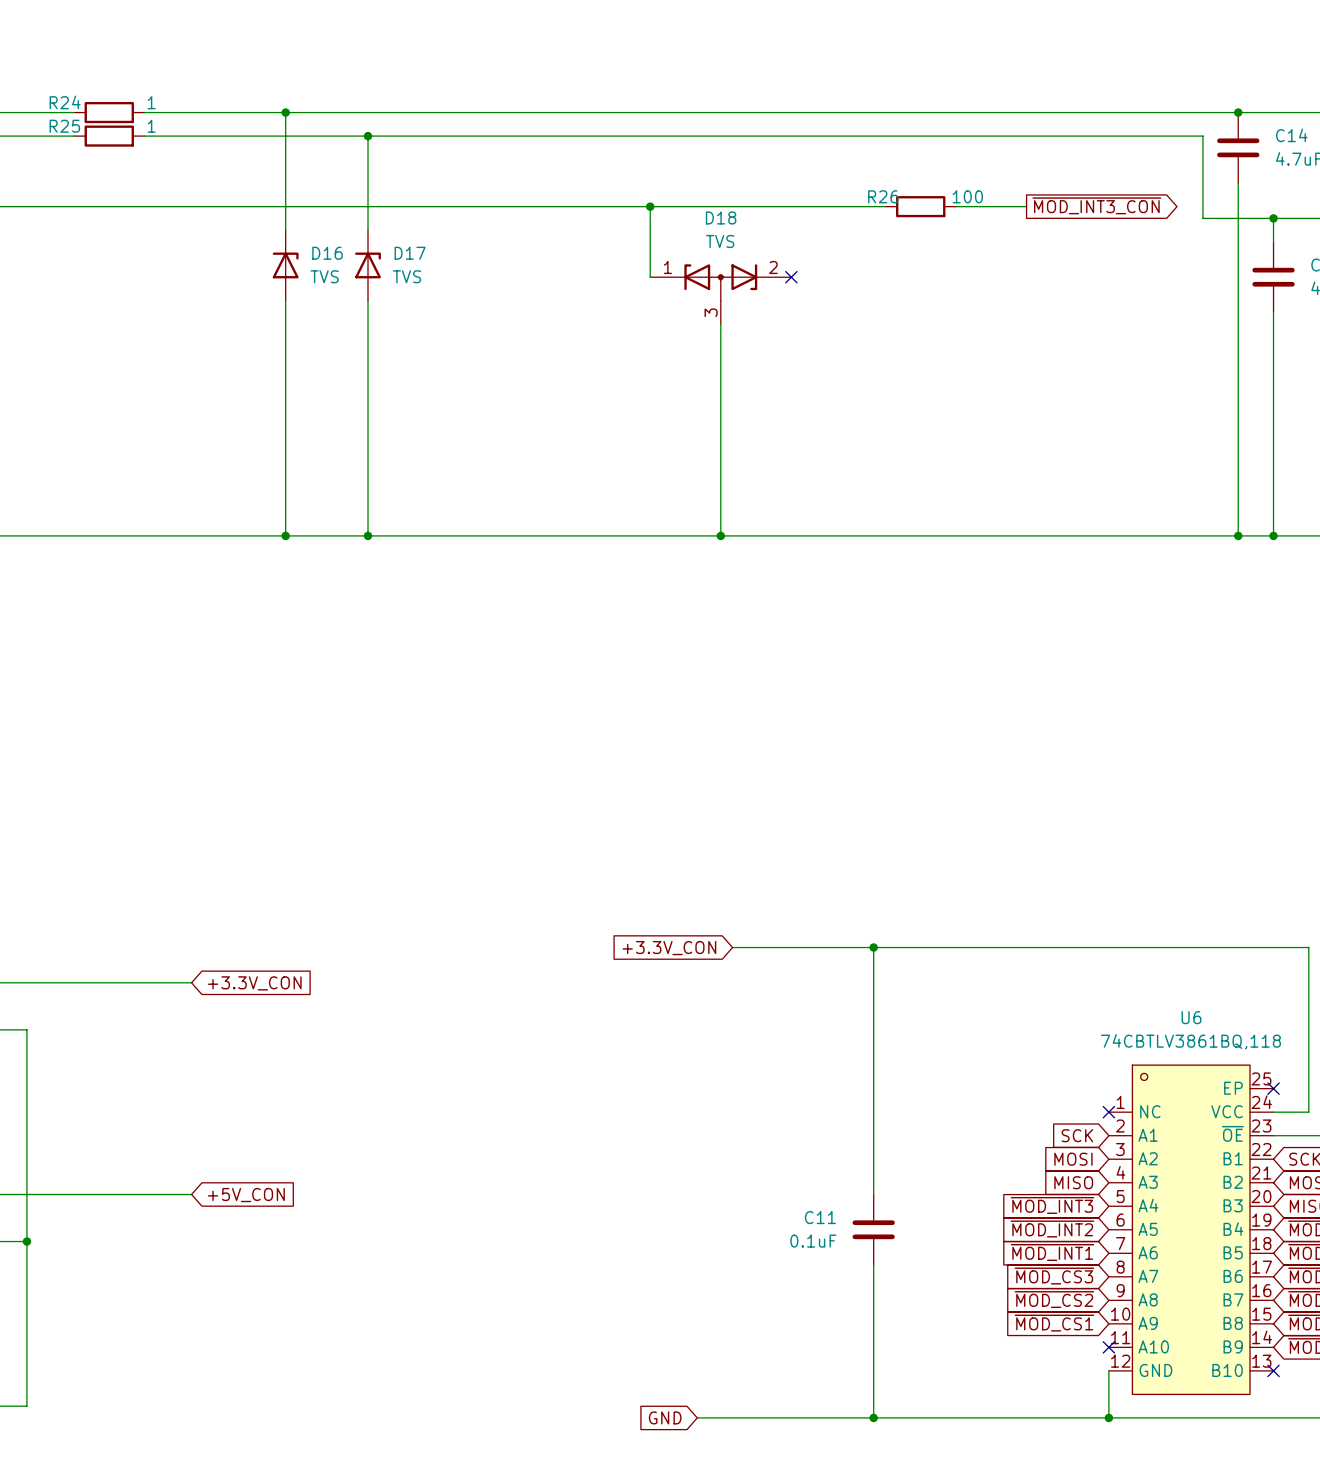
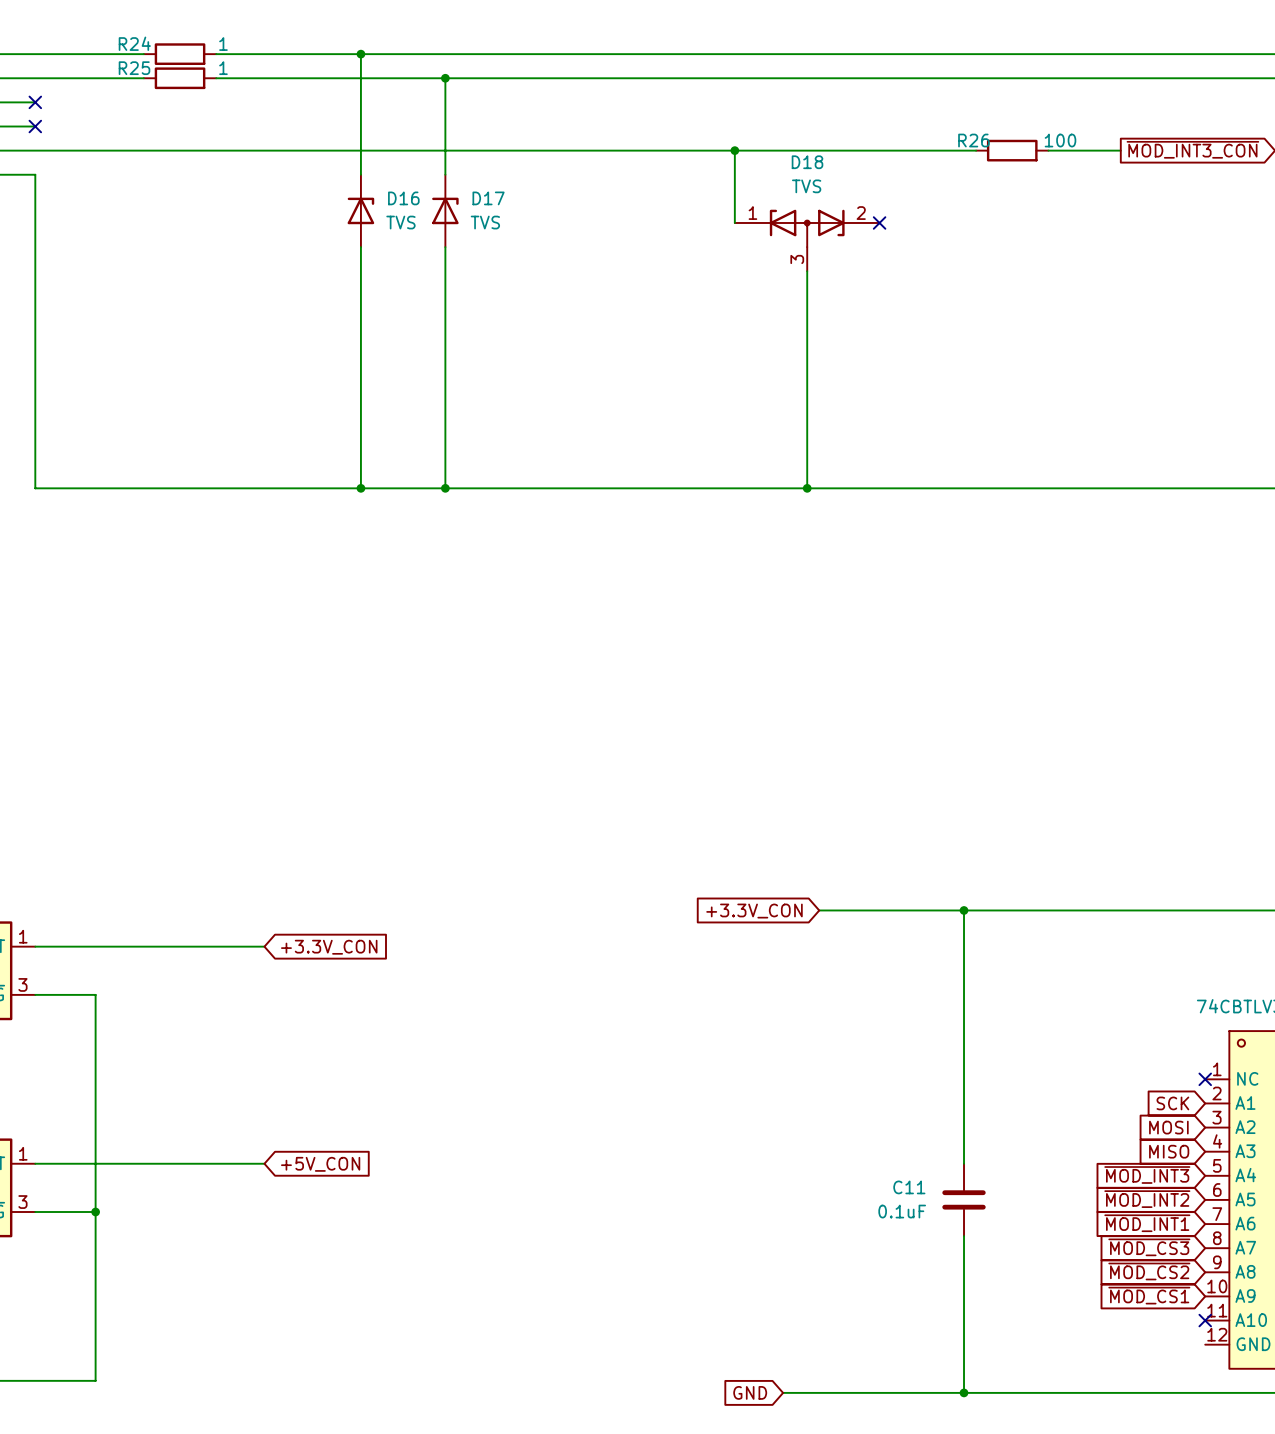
wire: (1108, 1370) (1108, 1417) -> none
junction: (1108, 1417) -> none

